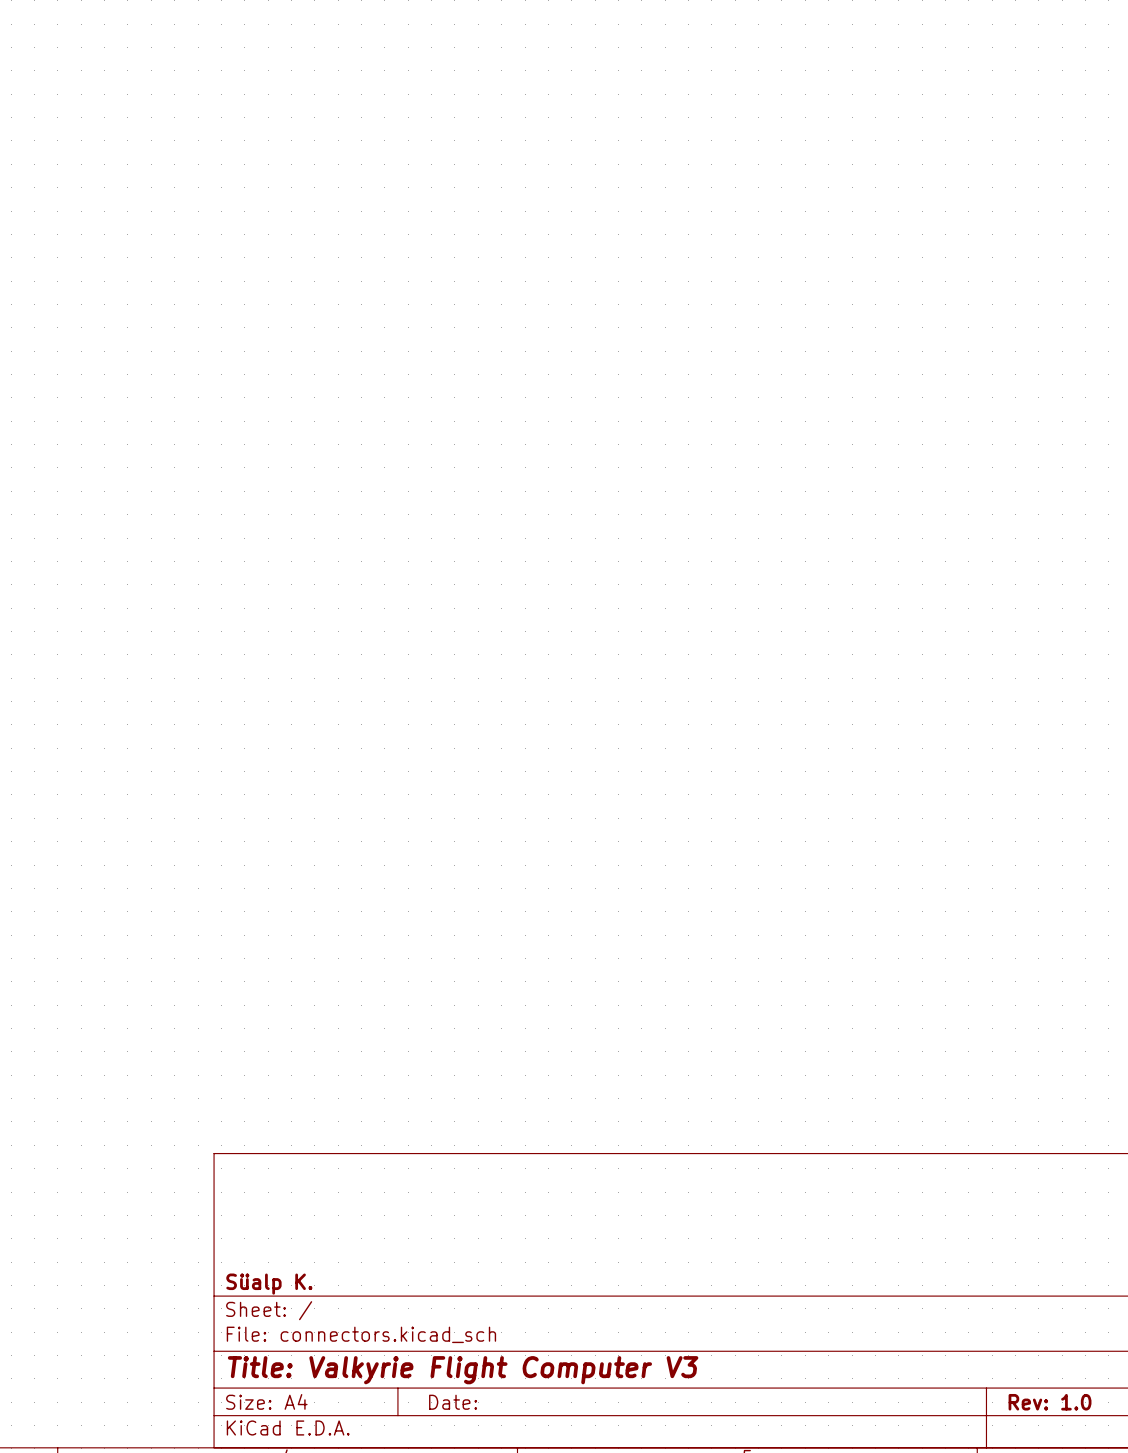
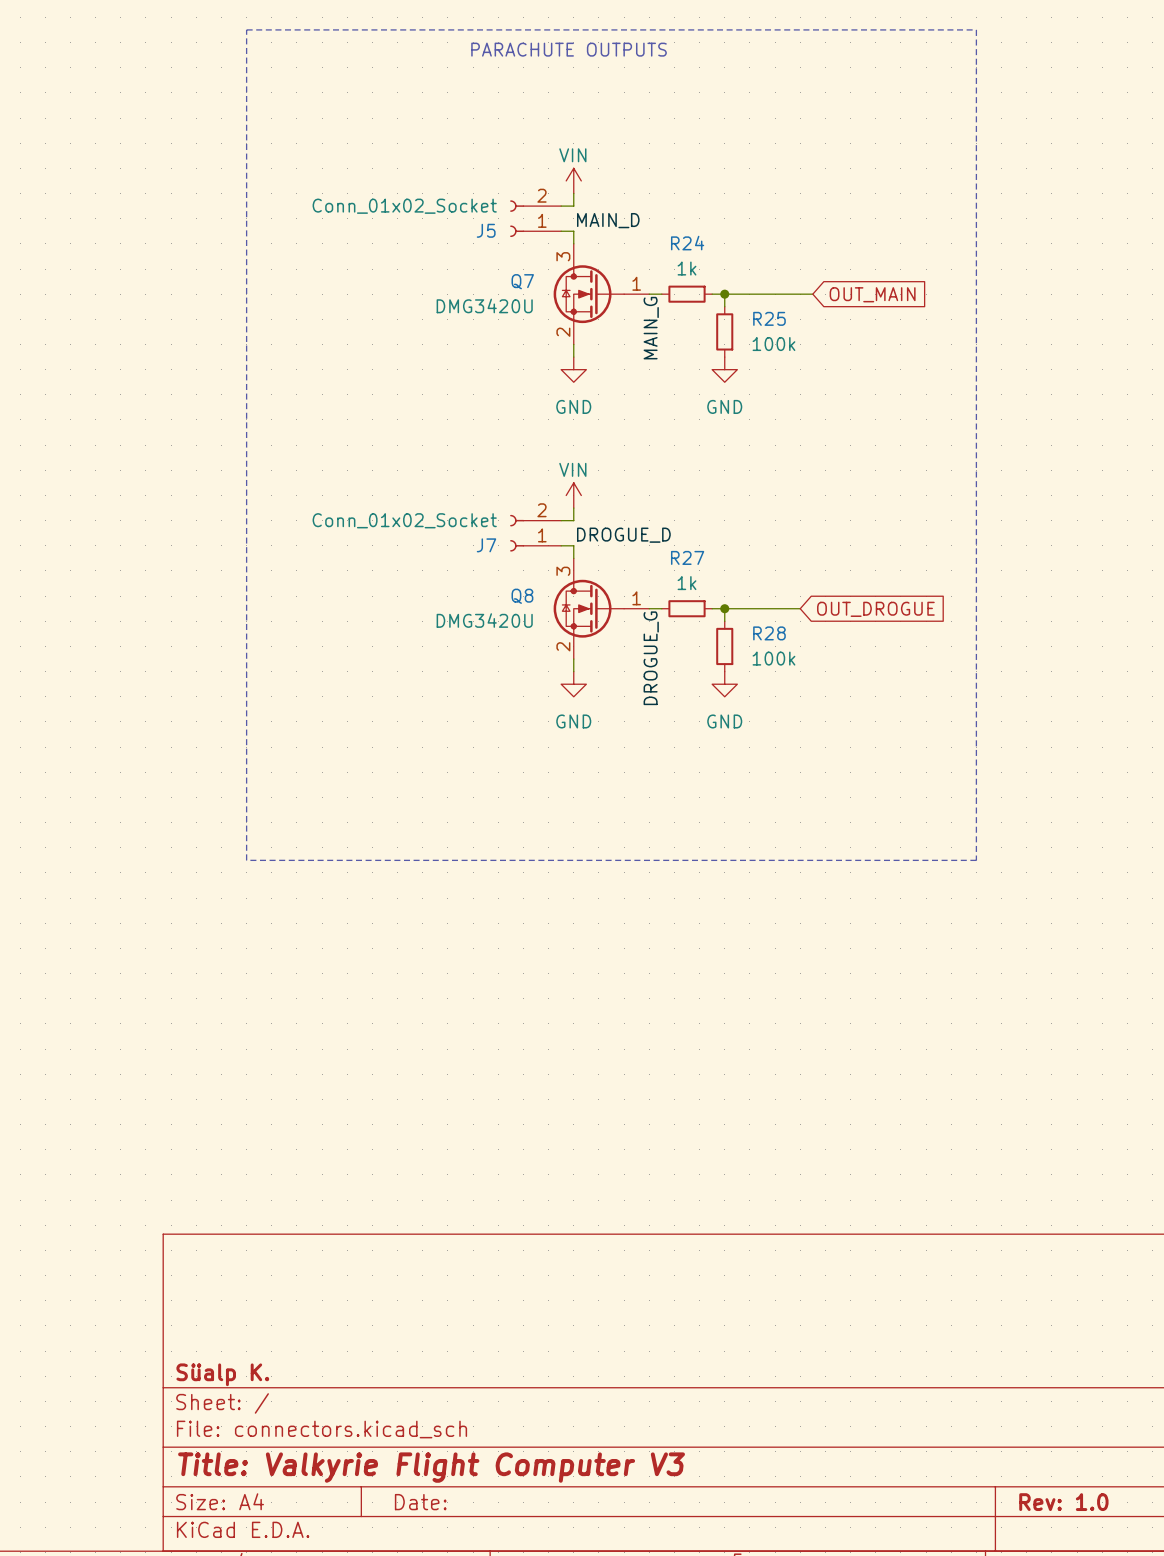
line: none -> (246, 29) (976, 29) (976, 860) (246, 860) (246, 29)
text: none -> PARACHUTE OUTPUTS (569, 49)
power symbol: none -> VIN (573, 180)
wire: none -> (573, 193) (573, 206) (561, 206)
J5: none -> Conn_01x02_Socket (535, 218)
label: none -> MAIN_D (608, 220)
wire: none -> (561, 231) (573, 231) (573, 243)
Q7: none -> DMG3420U (601, 294)
wire: none -> (649, 294) (661, 294)
R24: none -> 1k (687, 294)
wire: none -> (712, 294) (812, 294)
wire: none -> (724, 294) (724, 306)
junction: none -> (724, 294)
global label: none -> OUT_MAIN (872, 294)
label: none -> MAIN_G (651, 328)
R25: none -> 100k (724, 331)
wire: none -> (573, 344) (573, 357)
power symbol: none -> GND (573, 369)
power symbol: none -> GND (724, 369)
power symbol: none -> VIN (573, 495)
wire: none -> (573, 508) (573, 520) (561, 520)
J7: none -> Conn_01x02_Socket (535, 533)
label: none -> DROGUE_D (623, 535)
wire: none -> (561, 545) (573, 545) (573, 558)
Q8: none -> DMG3420U (601, 608)
wire: none -> (649, 608) (661, 608)
R27: none -> 1k (687, 608)
wire: none -> (712, 608) (800, 608)
wire: none -> (724, 608) (724, 621)
junction: none -> (724, 608)
global label: none -> OUT_DROGUE (875, 609)
R28: none -> 100k (724, 646)
wire: none -> (573, 659) (573, 671)
label: none -> DROGUE_G (651, 658)
power symbol: none -> GND (573, 684)
power symbol: none -> GND (724, 684)

